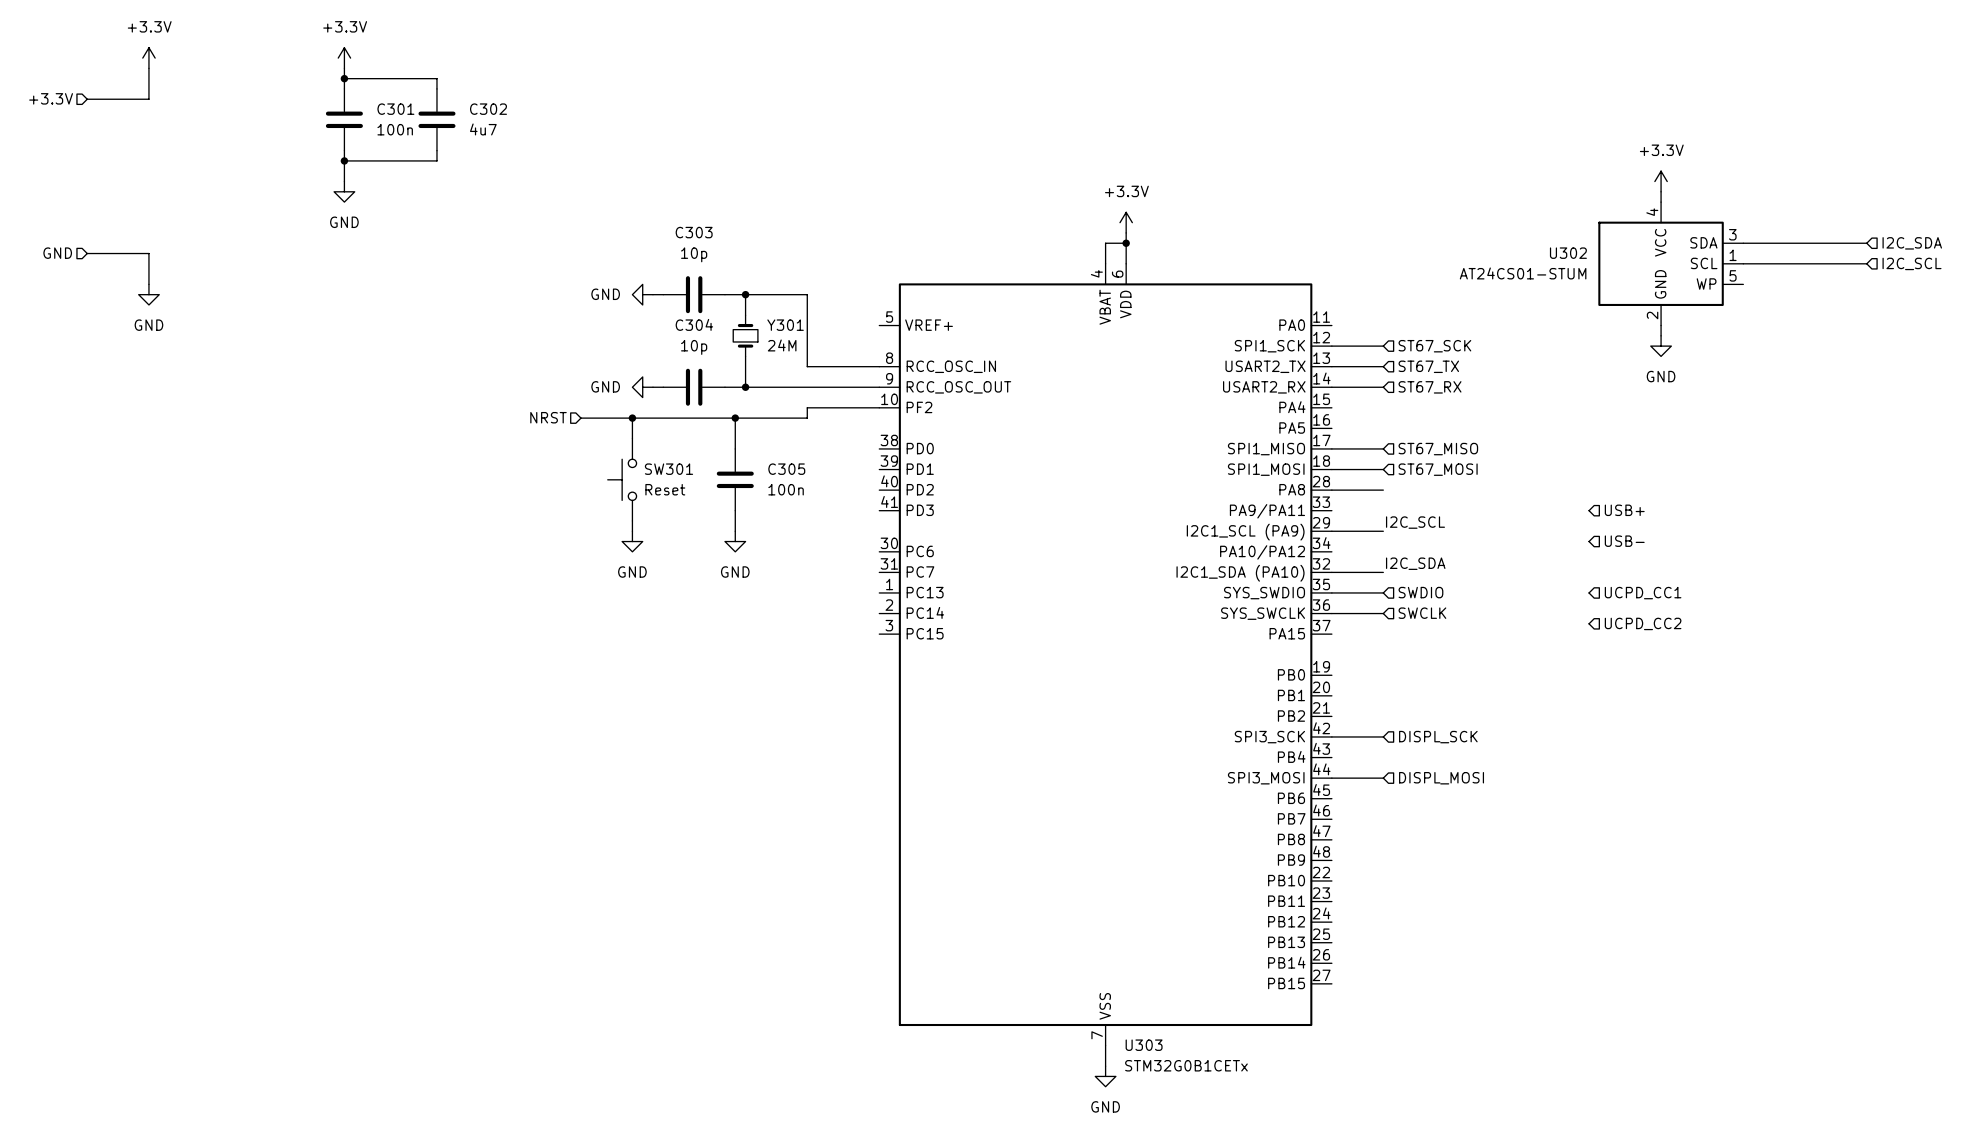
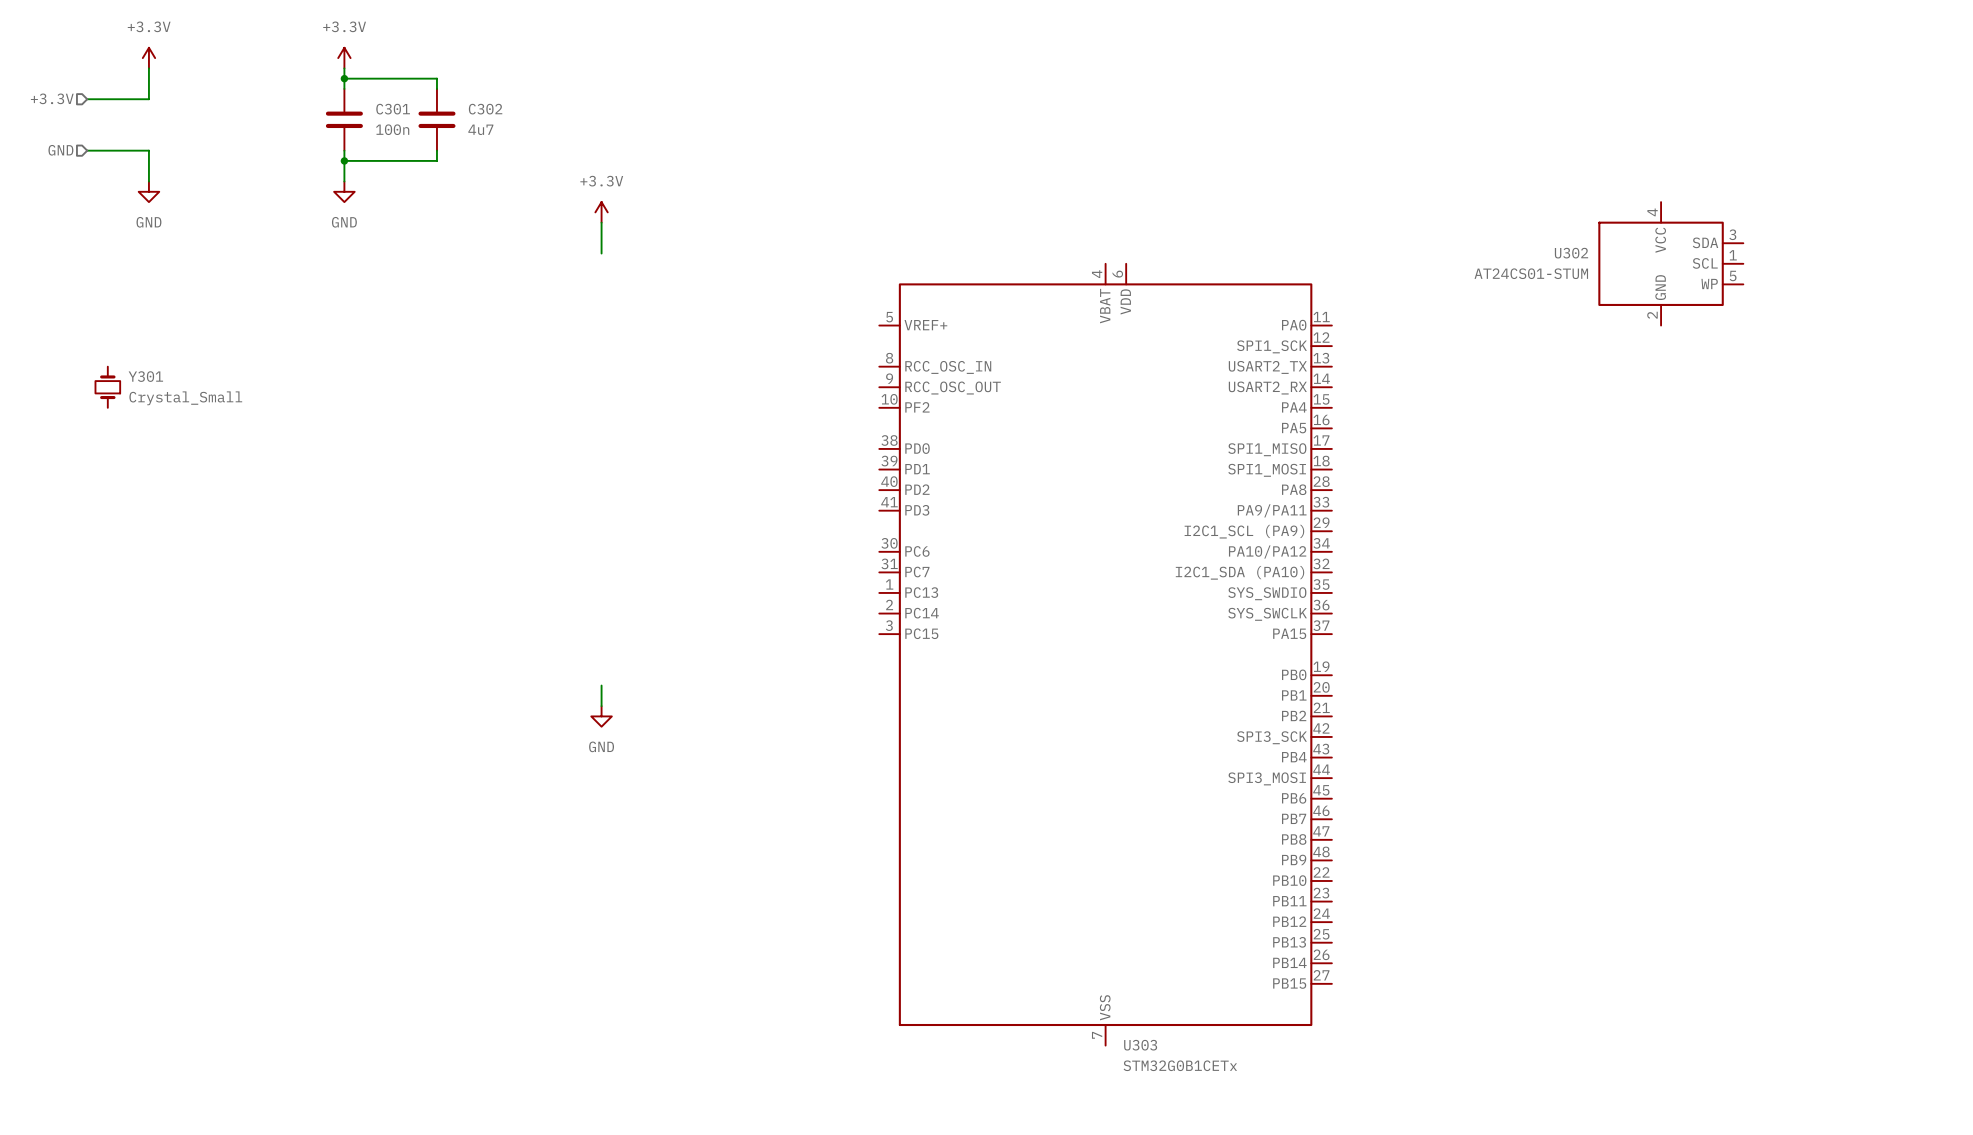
power symbol: +3.3V (1661, 181) -> none
wire: (1661, 191) (1661, 202) -> none
power symbol: none -> +3.3V (601, 212)
power symbol: +3.3V (1126, 222) -> none
wire: (1126, 232) (1126, 263) -> none
wire: (1126, 243) (1105, 243) (1105, 263) -> none
junction: (1126, 243) -> none
wire: (1743, 243) (1866, 243) -> none
hierarchical label: I2C_SDA (1912, 243) -> none
hierarchical label position: GND (57, 253) -> GND (60, 150)
wire: (87, 253) (148, 253) (148, 284) -> (87, 150) (148, 150) (148, 181)
wire: (1743, 263) (1866, 263) -> none
hierarchical label: I2C_SCL (1912, 263) -> none
power symbol position: GND (148, 294) -> GND (148, 191)
power symbol: GND (642, 294) -> none
wire: (652, 294) (663, 294) -> none
C303: 10p (694, 294) -> none
wire: (725, 294) (807, 294) (807, 366) (879, 366) -> none
wire: (745, 294) (745, 315) -> none
junction: (745, 294) -> none
wire: (1661, 325) (1661, 335) -> none
Y301 position: (745, 335) -> (107, 387)
Y301 value: 24M (782, 345) -> Crystal_Small (185, 398)
wire: (1331, 346) (1383, 346) -> none
hierarchical label: ST67_SCK (1434, 346) -> none
power symbol: GND (1661, 346) -> none
wire: (745, 356) (745, 387) -> (601, 222) (601, 253)
wire: (1331, 366) (1383, 366) -> none
hierarchical label: ST67_TX (1428, 366) -> none
power symbol: GND (642, 387) -> none
wire: (652, 387) (663, 387) -> none
C304: 10p (694, 387) -> none
wire: (725, 387) (879, 387) -> none
junction: (745, 387) -> none
wire: (1331, 387) (1383, 387) -> none
hierarchical label: ST67_RX (1430, 387) -> none
wire: (879, 407) (807, 407) (807, 418) (580, 418) -> none
hierarchical label: NRST (548, 417) -> none
wire: (632, 418) (632, 438) -> none
junction: (632, 418) -> none
wire: (735, 418) (735, 448) -> none
junction: (735, 418) -> none
wire: (1331, 448) (1383, 448) -> none
hierarchical label: ST67_MISO (1438, 449) -> none
wire: (1331, 469) (1383, 469) -> none
hierarchical label: ST67_MOSI (1438, 469) -> none
SW301: Reset (622, 479) -> none
C305: 100n (735, 479) -> none
wire: (1331, 490) (1383, 490) -> none
wire: (735, 510) (735, 531) -> none
hierarchical label: USB+ (1624, 510) -> none
wire: (632, 520) (632, 531) -> none
label: I2C_SCL (1415, 522) -> none
wire: (1331, 531) (1383, 531) -> none
power symbol: GND (632, 541) -> none
power symbol: GND (735, 541) -> none
hierarchical label: USB- (1624, 541) -> none
label: I2C_SDA (1415, 563) -> none
wire: (1331, 572) (1383, 572) -> none
wire: (1331, 592) (1383, 592) -> none
hierarchical label: SWDIO (1420, 592) -> none
hierarchical label: UCPD_CC1 (1643, 593) -> none
wire: (1331, 613) (1383, 613) -> none
hierarchical label: SWCLK (1422, 613) -> none
hierarchical label: UCPD_CC2 (1643, 623) -> none
wire: none -> (601, 685) (601, 706)
power symbol: none -> GND (601, 716)
wire: (1331, 736) (1383, 736) -> none
hierarchical label: DISPL_SCK (1438, 737) -> none
wire: (1331, 778) (1383, 778) -> none
hierarchical label: DISPL_MOSI (1441, 778) -> none
wire: (1105, 1045) (1105, 1066) -> none
power symbol: GND (1105, 1076) -> none

